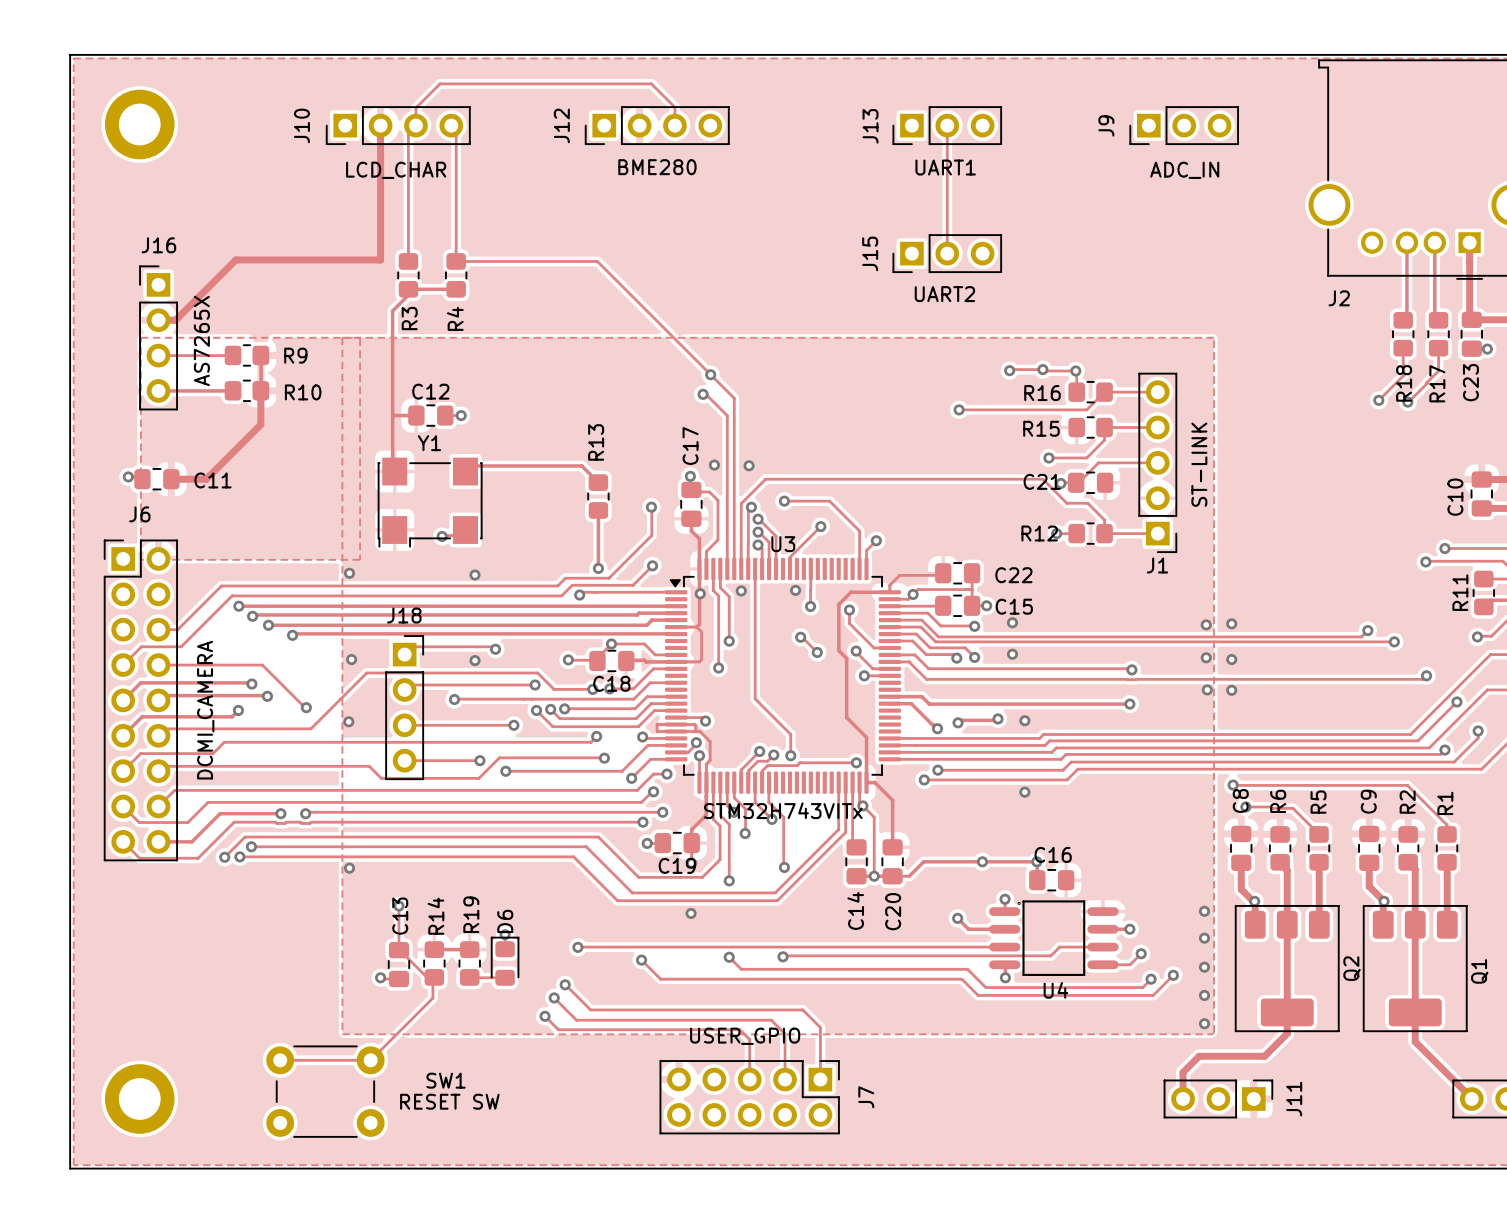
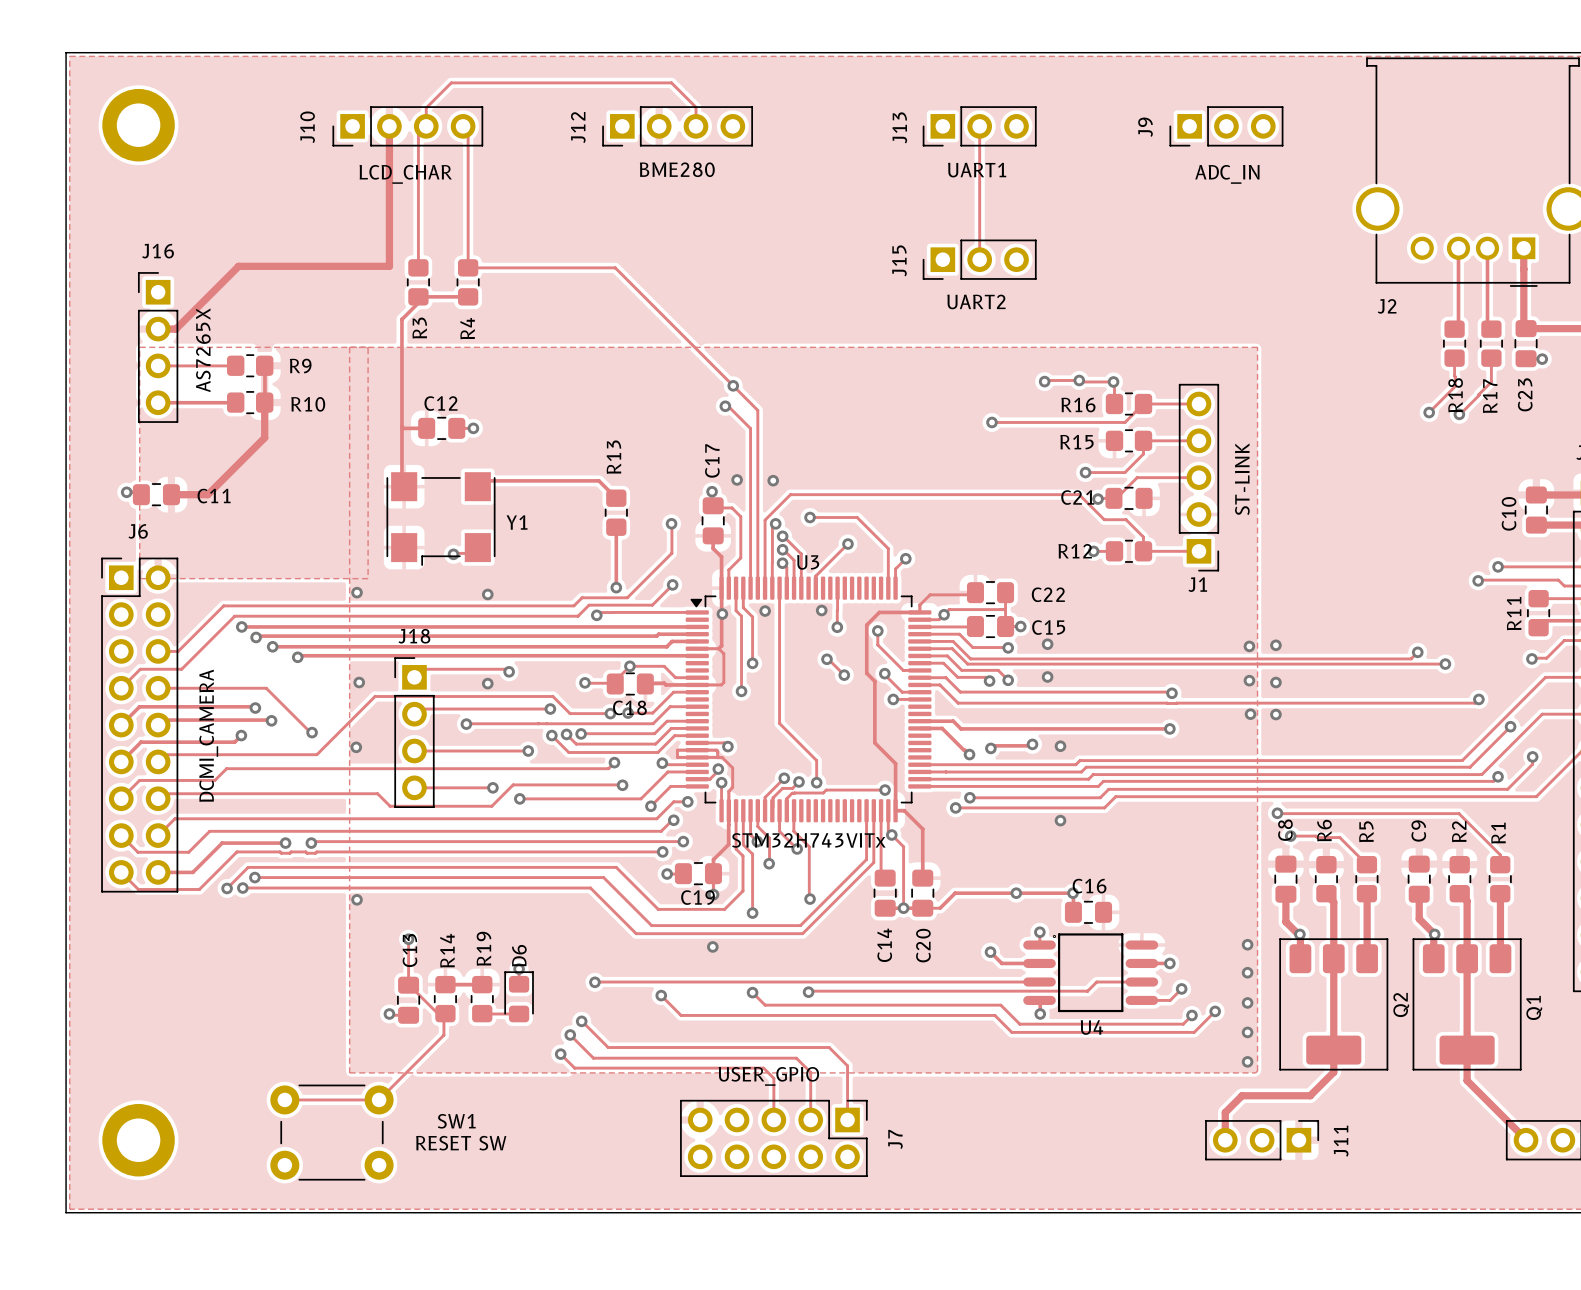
Y1 name position: Y1 (429, 443) -> Y1 (517, 522)
Y1 footprint: [377, 457, 483, 548] -> [386, 472, 496, 566]
J18 footprint: [385, 635, 425, 781] -> [394, 657, 435, 809]

